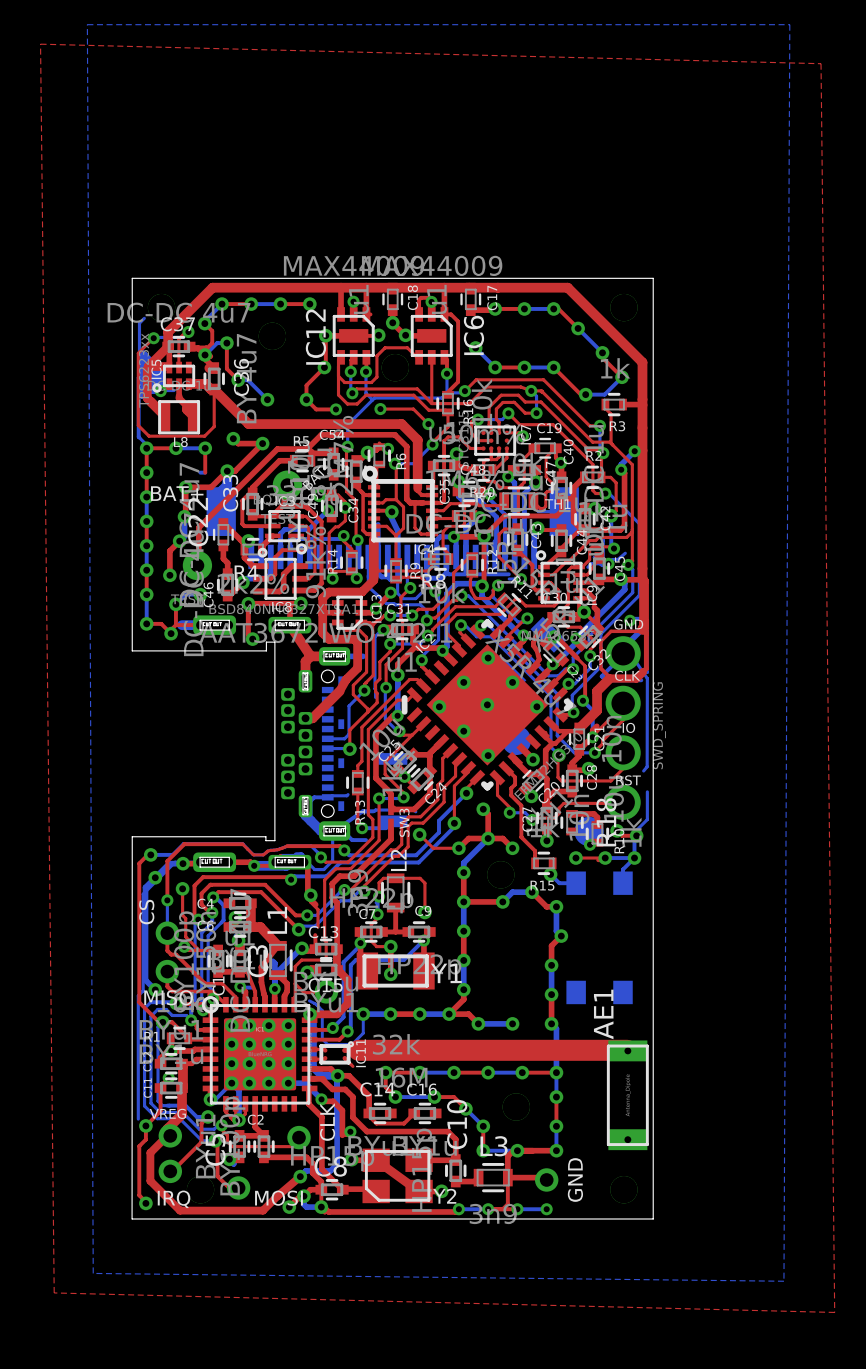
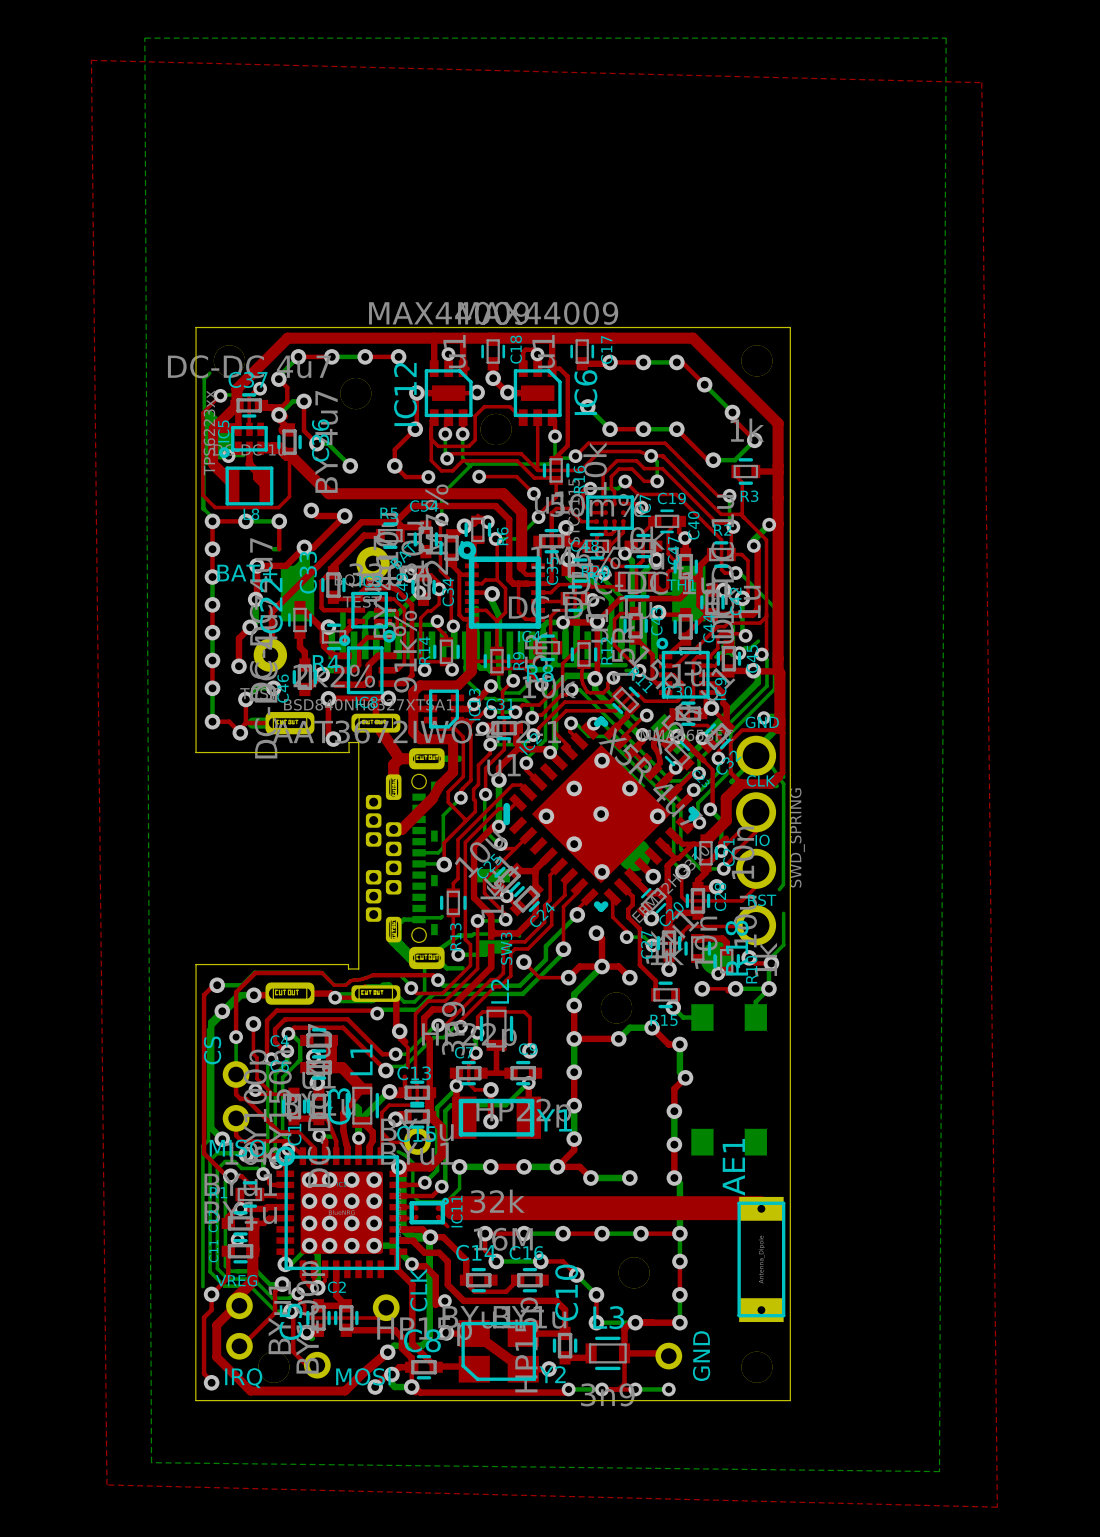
bottom track: (383, 629) (374, 636) (375, 697) -> none

